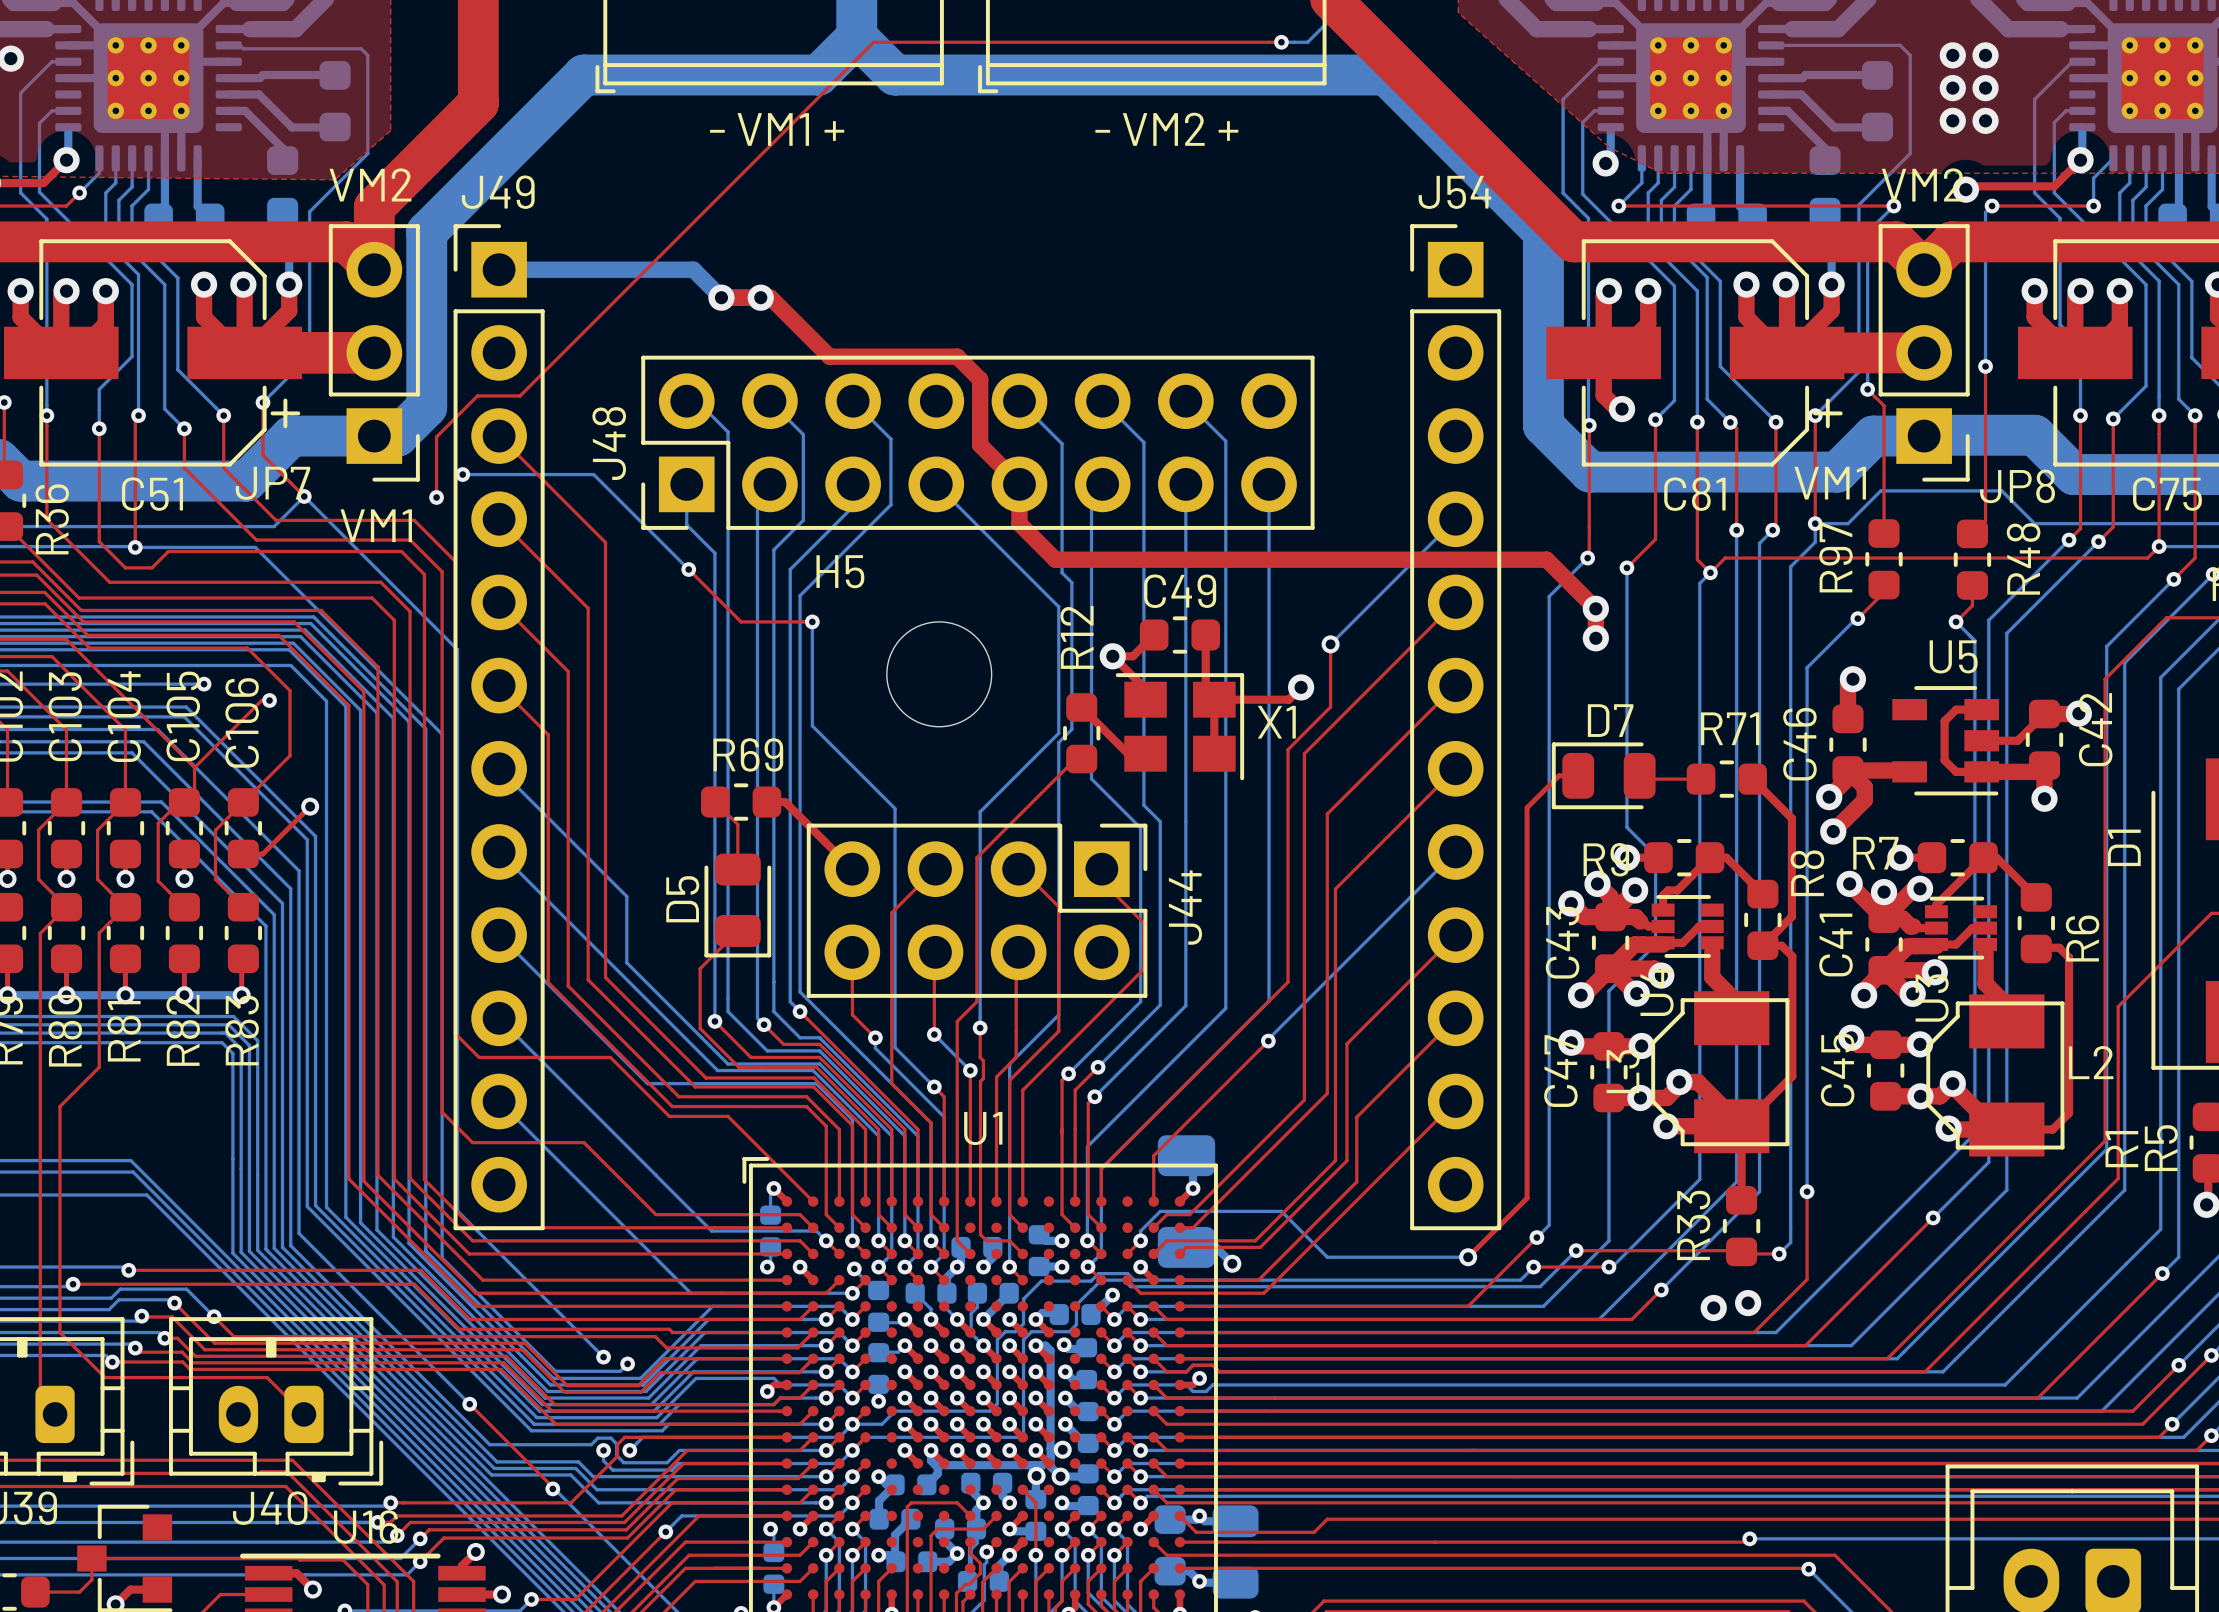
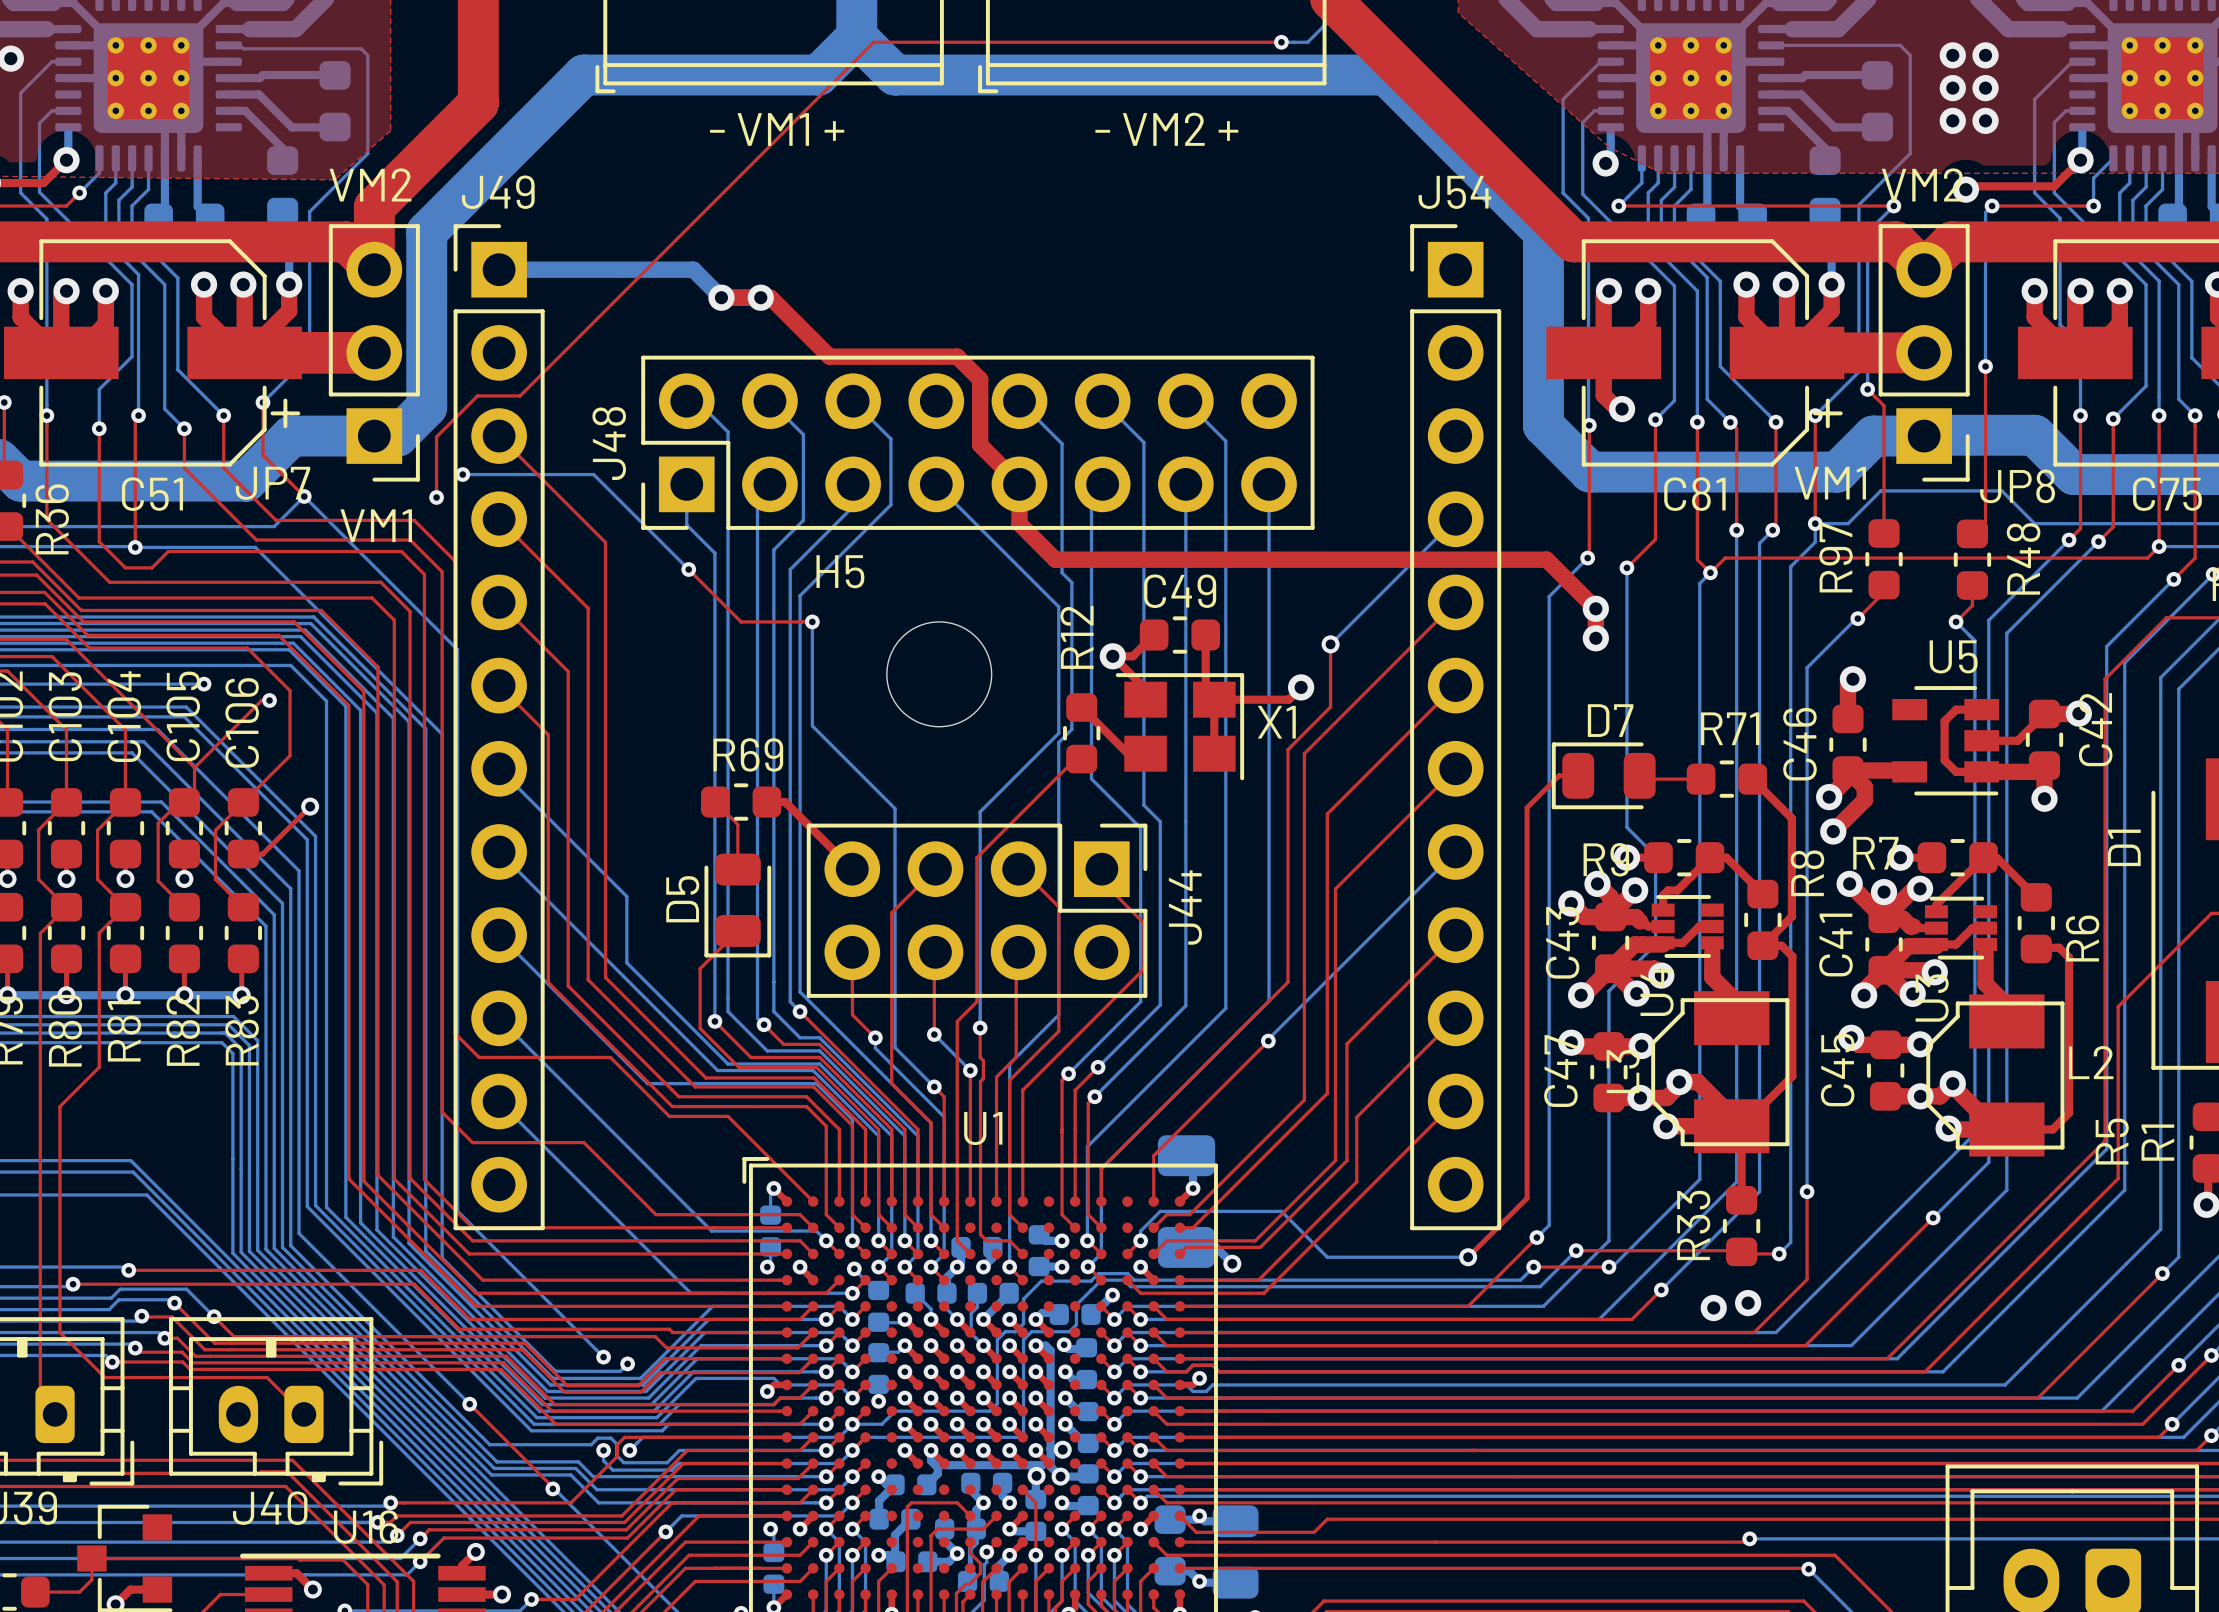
R5 name position: R5 (2161, 1148) -> R5 (2112, 1141)
R1 name position: R1 (2121, 1149) -> R1 (2157, 1142)

